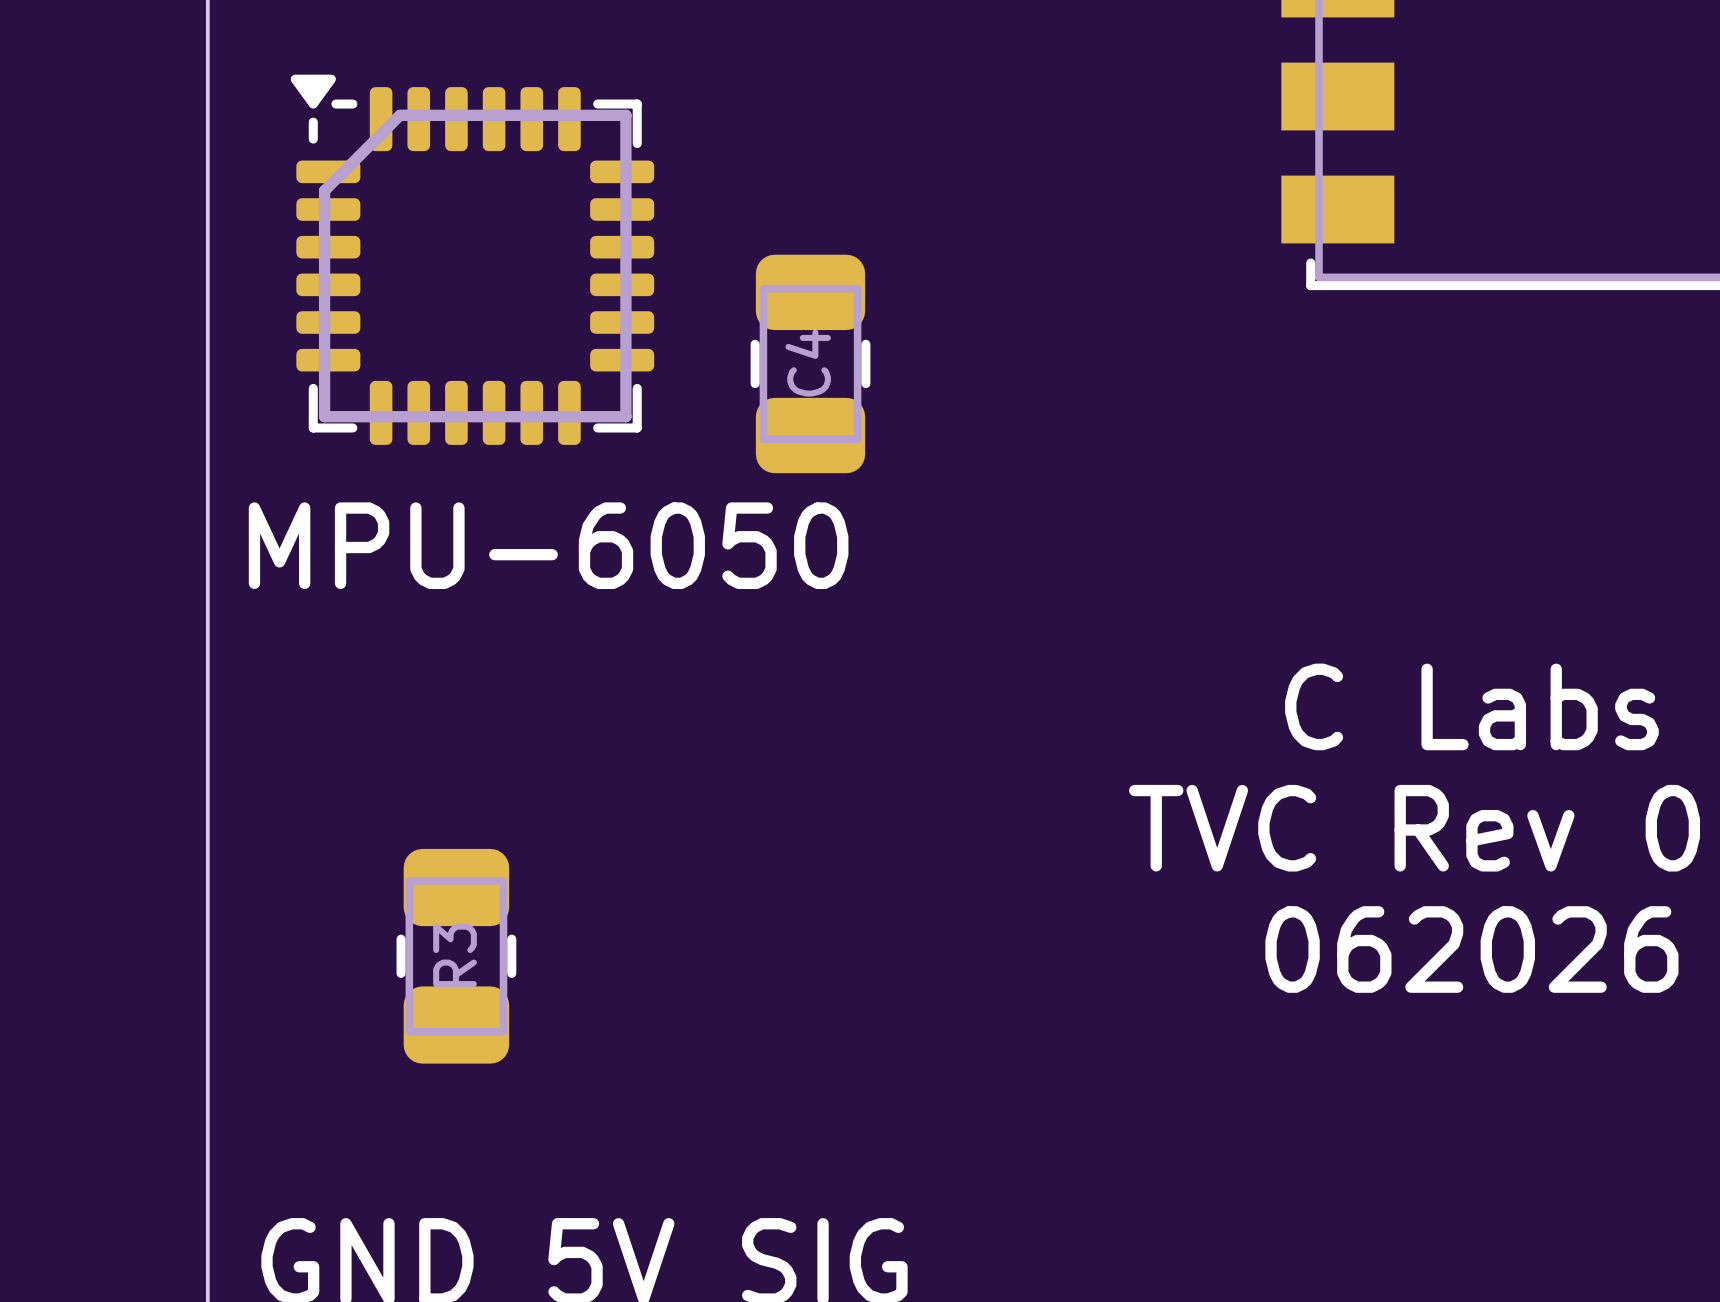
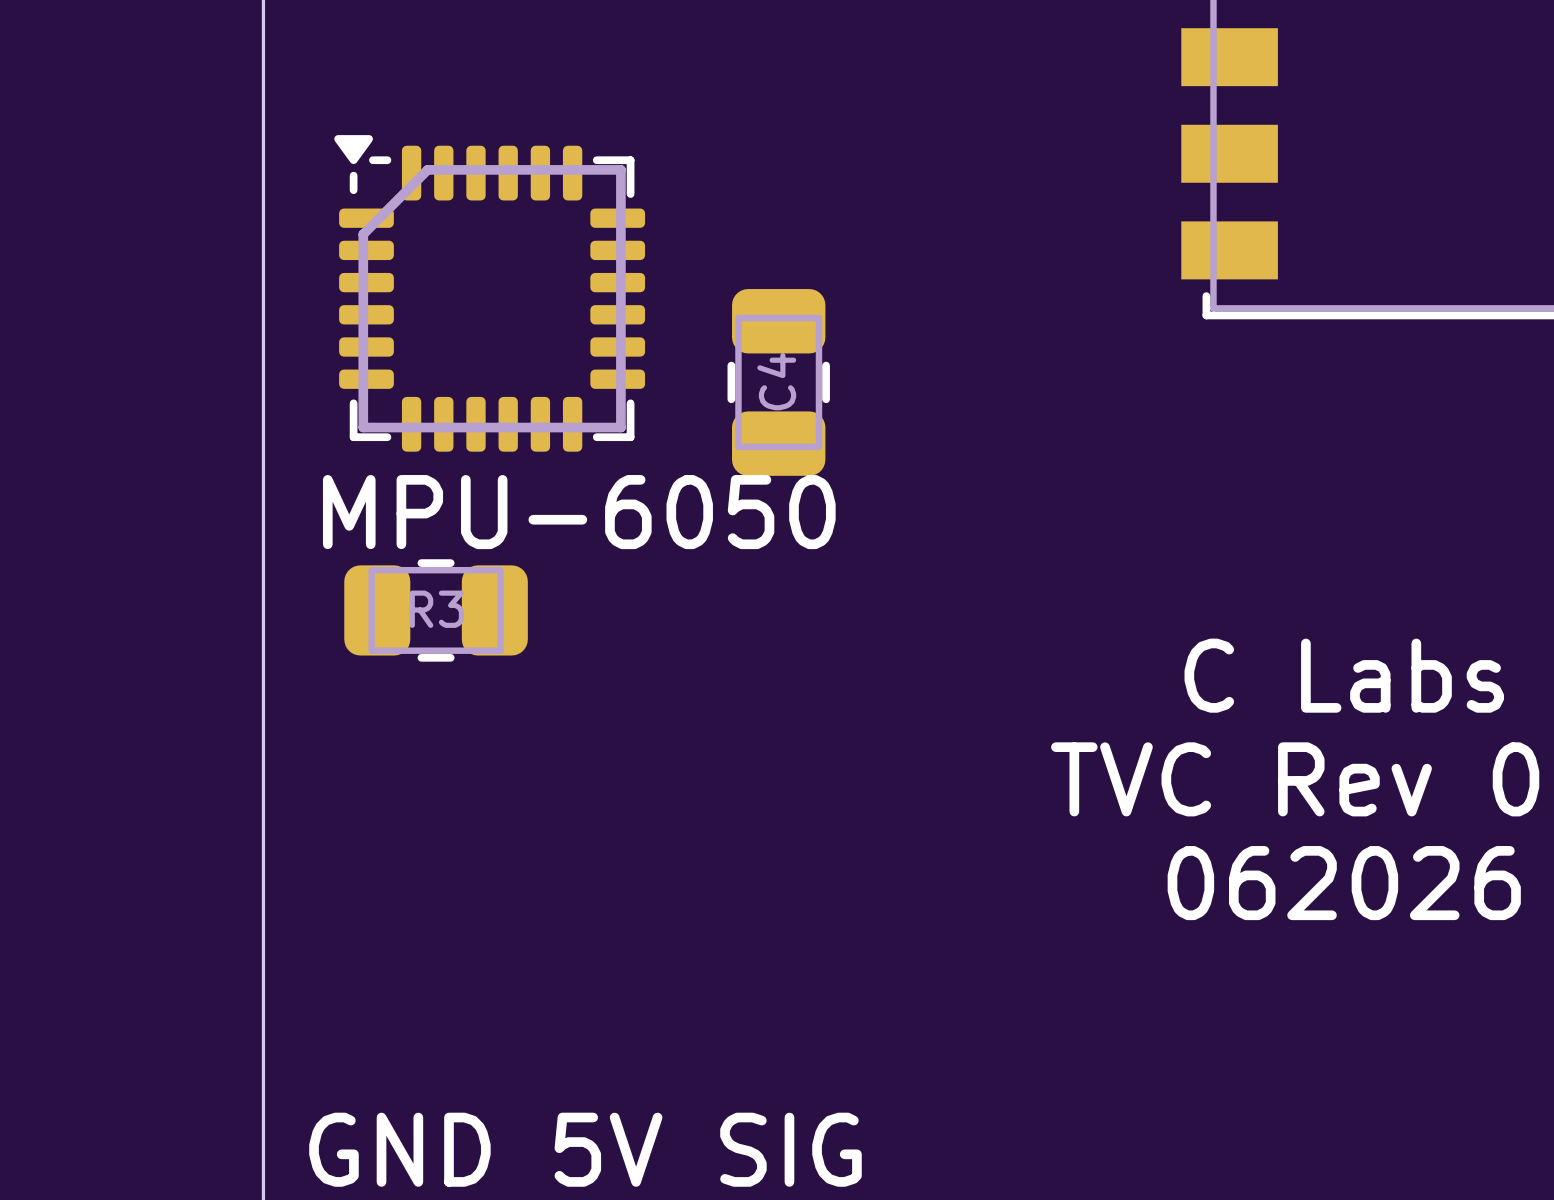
text position: MPU-6050 (548, 545) -> MPU-6050 (579, 512)
R3 rotation: 0° (456, 956) -> 90° clockwise (436, 610)
R3 position: (456, 956) -> (436, 610)

